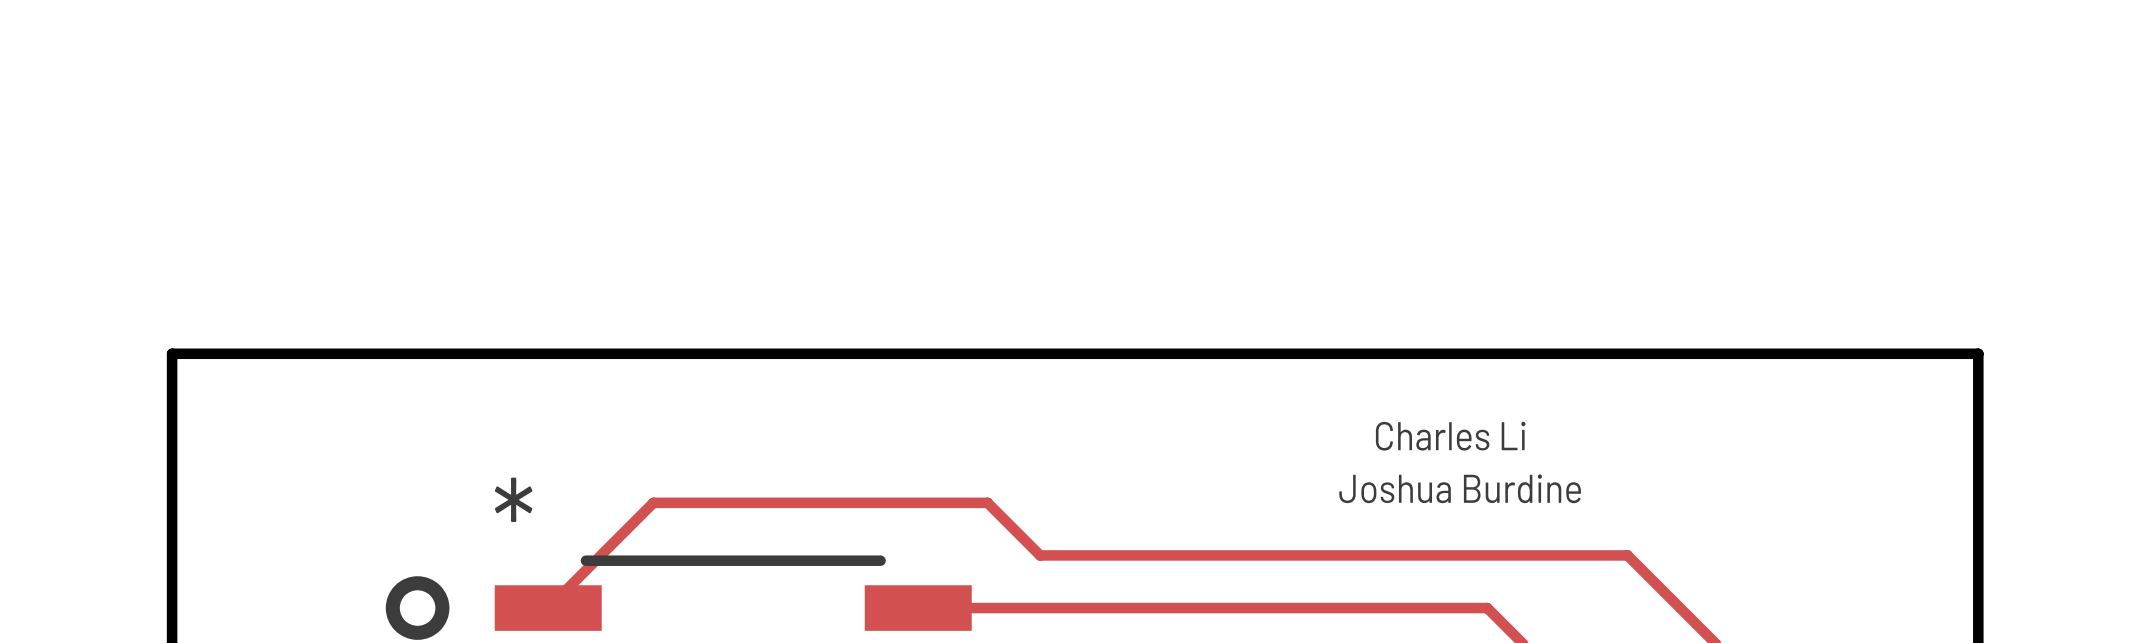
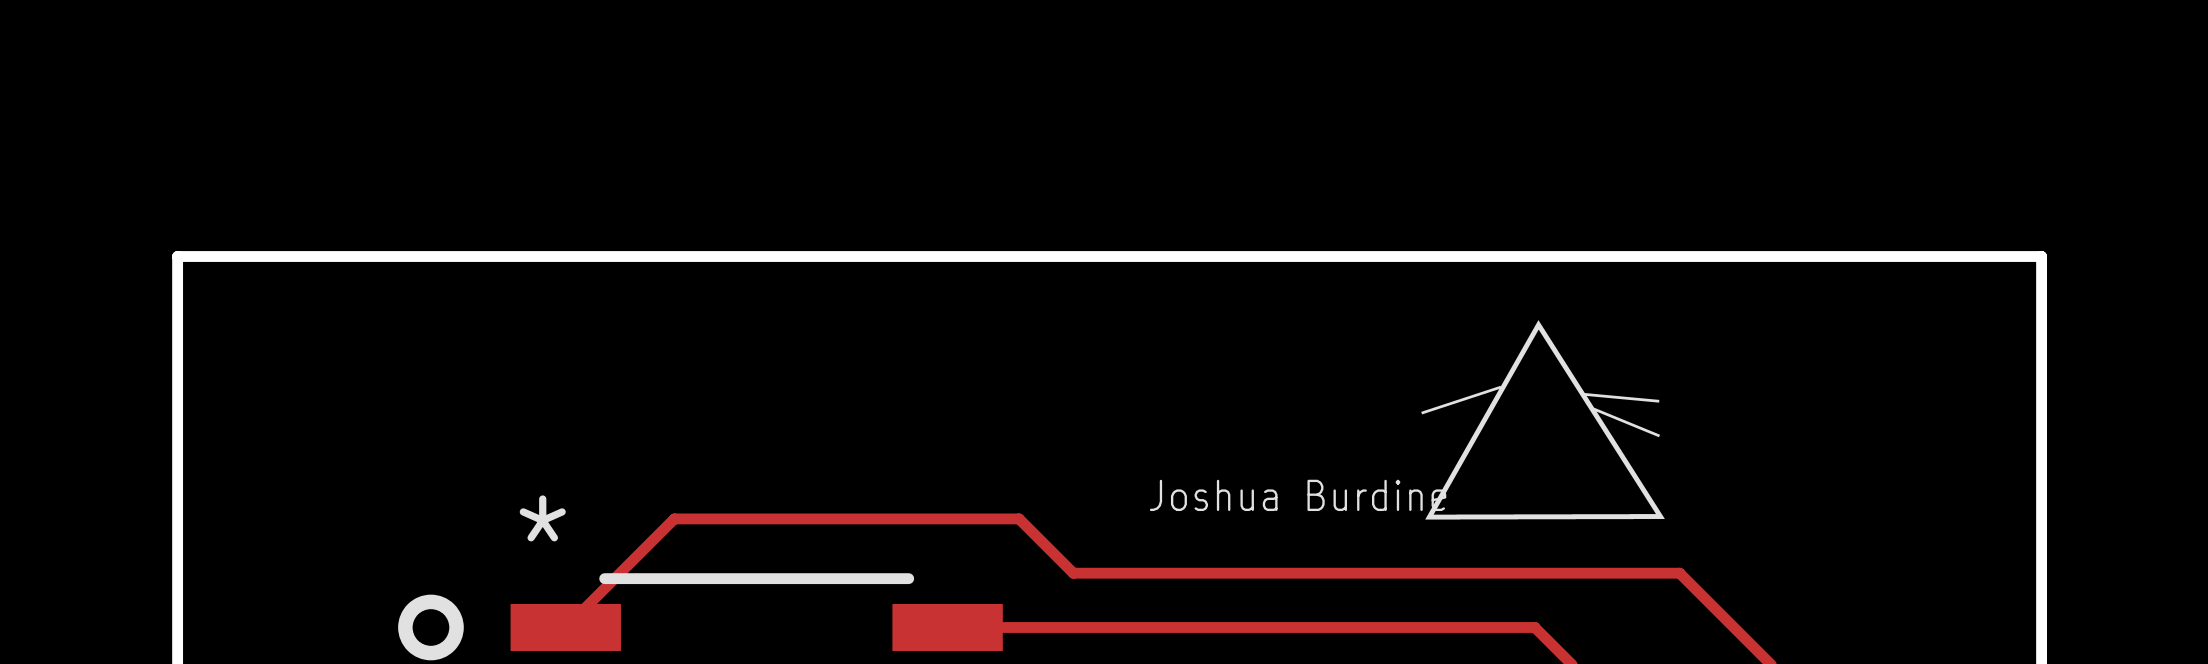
drawing: none -> [1421, 320, 1665, 520]
board edge: (172, 353) (1978, 353) -> (177, 365) (177, 256) (2041, 256) (2041, 365)
text: Charles Li (1450, 436) -> none
text position: Joshua Burdine (1460, 488) -> Joshua Burdine (1298, 495)

